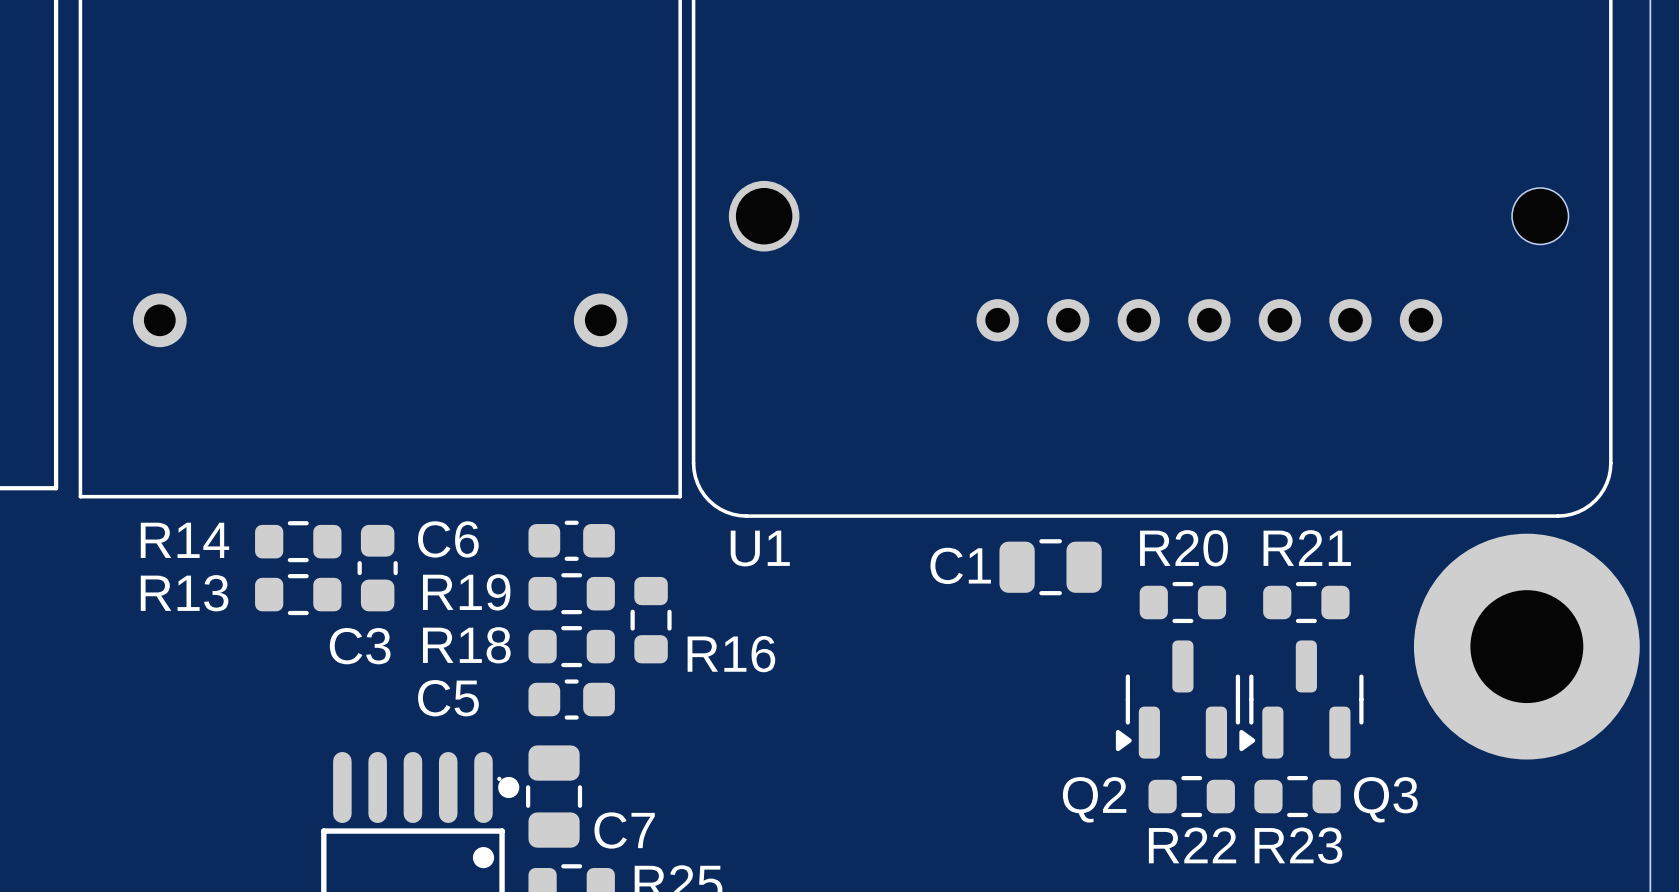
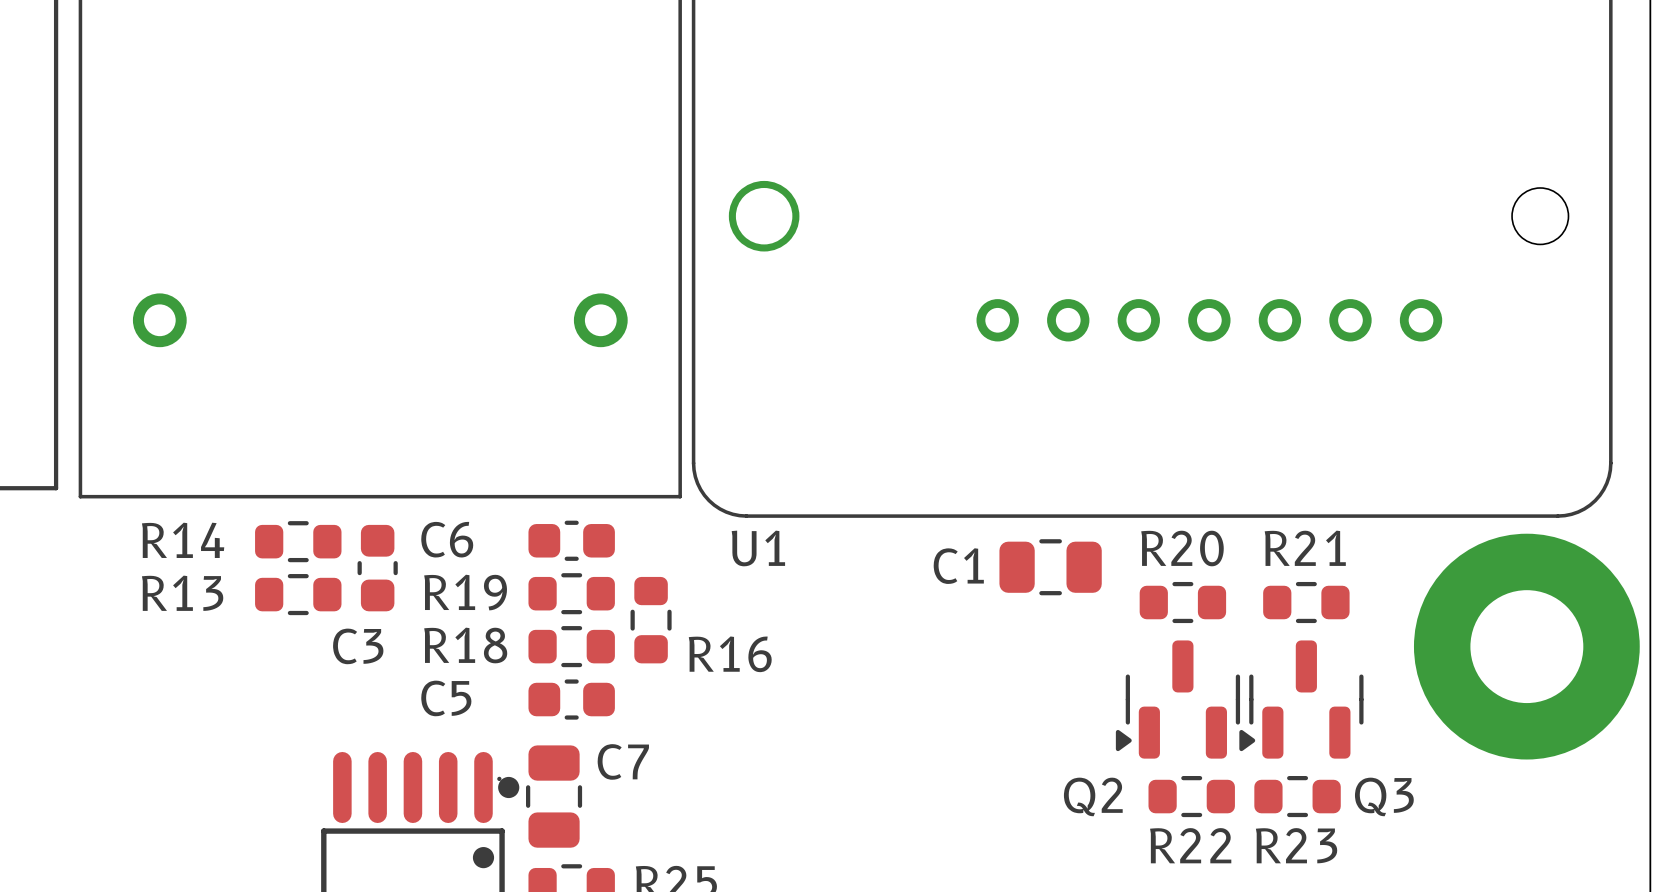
C7 name position: C7 (624, 830) -> C7 (623, 761)

